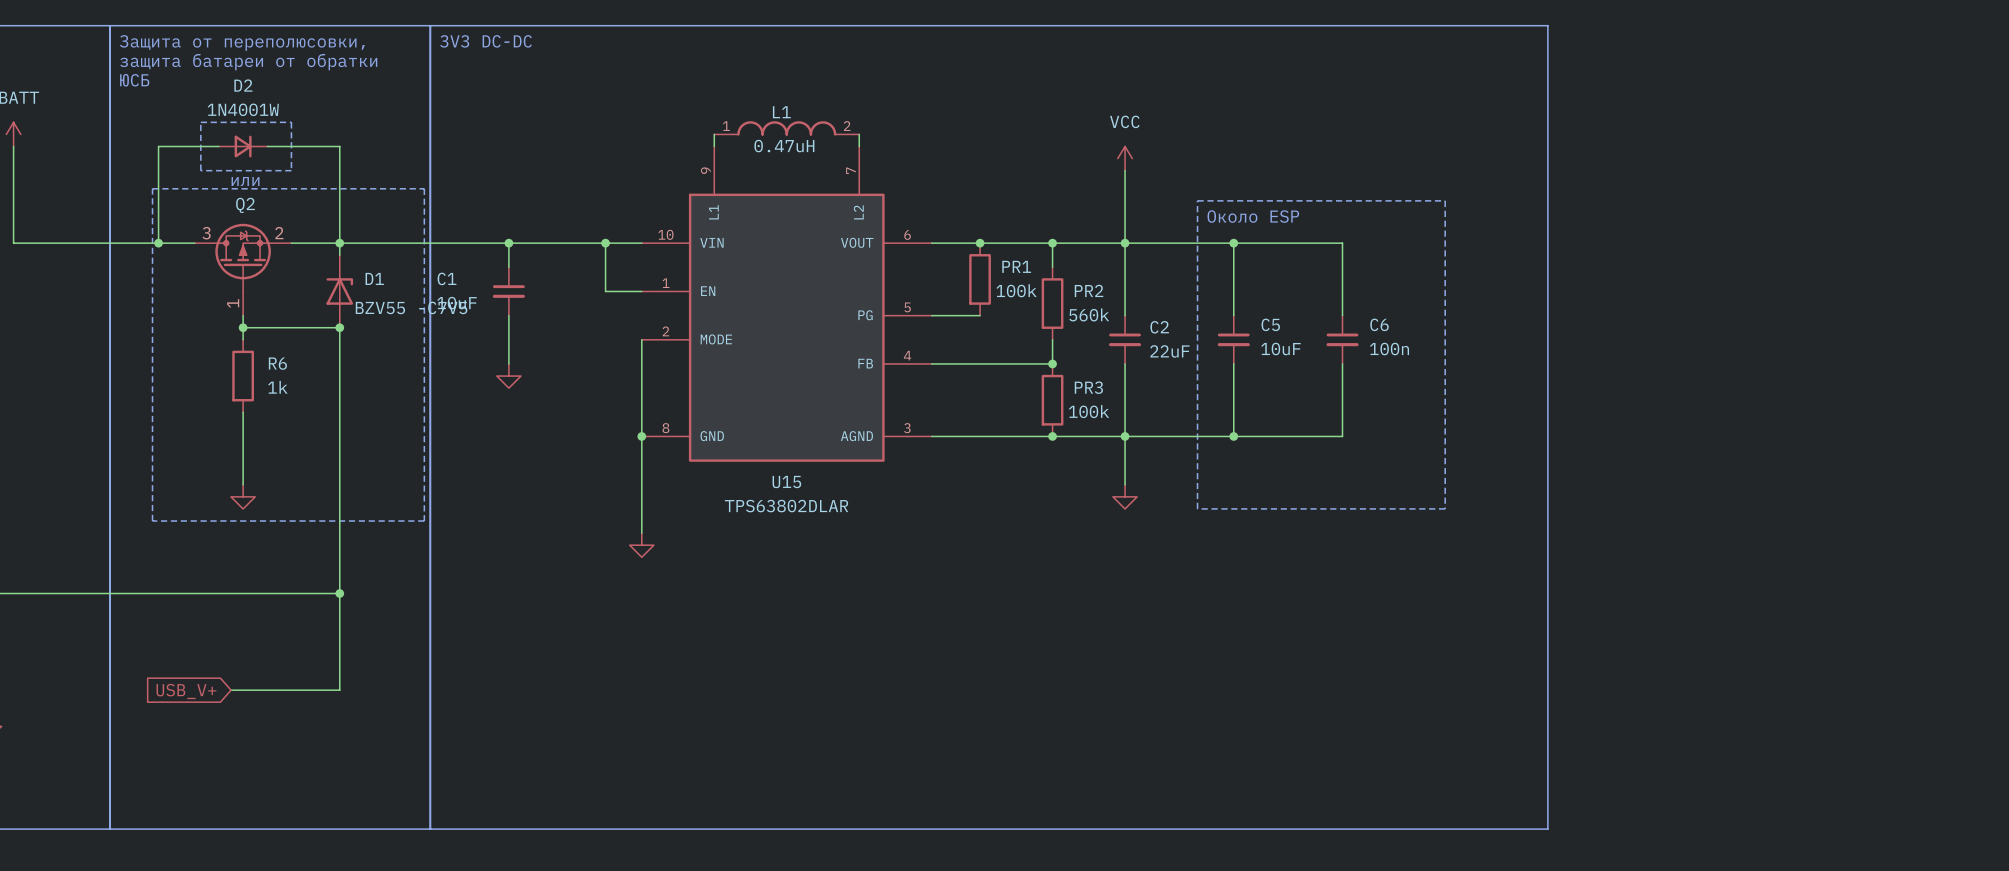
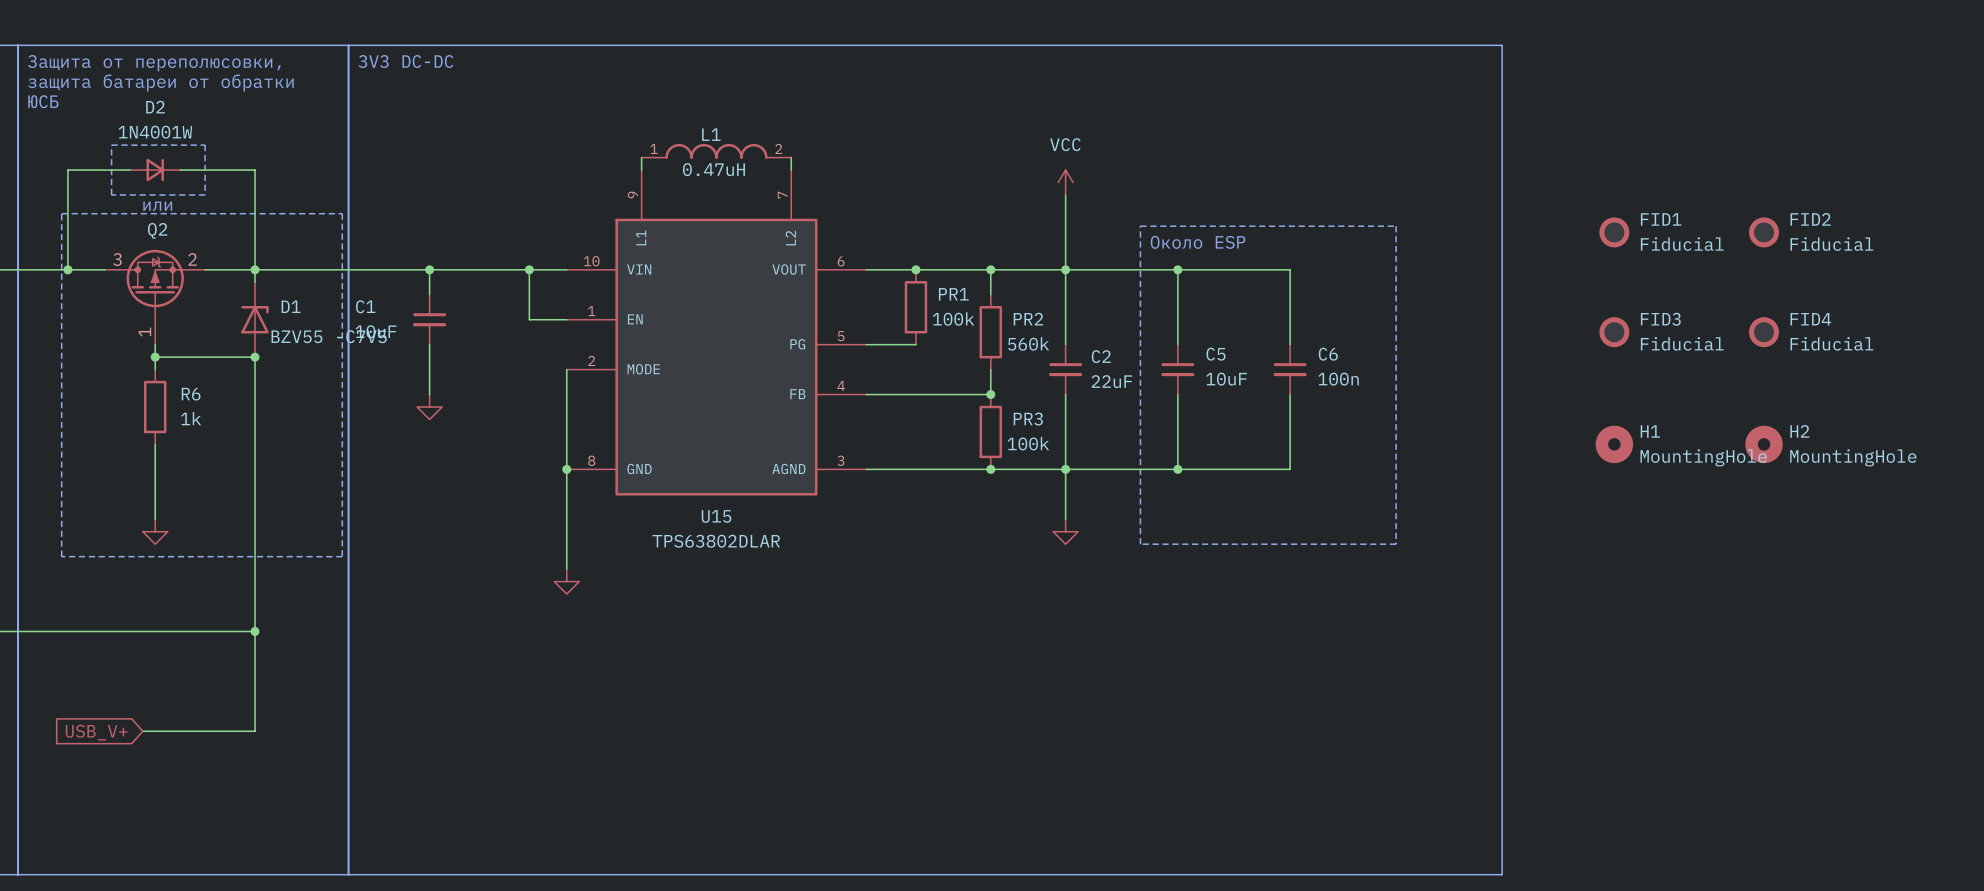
FID1: none -> Fiducial (1614, 232)
FID2: none -> Fiducial (1764, 232)
FID3: none -> Fiducial (1614, 332)
FID4: none -> Fiducial (1764, 332)
H1: none -> MountingHole (1614, 444)
H2: none -> MountingHole (1764, 444)

